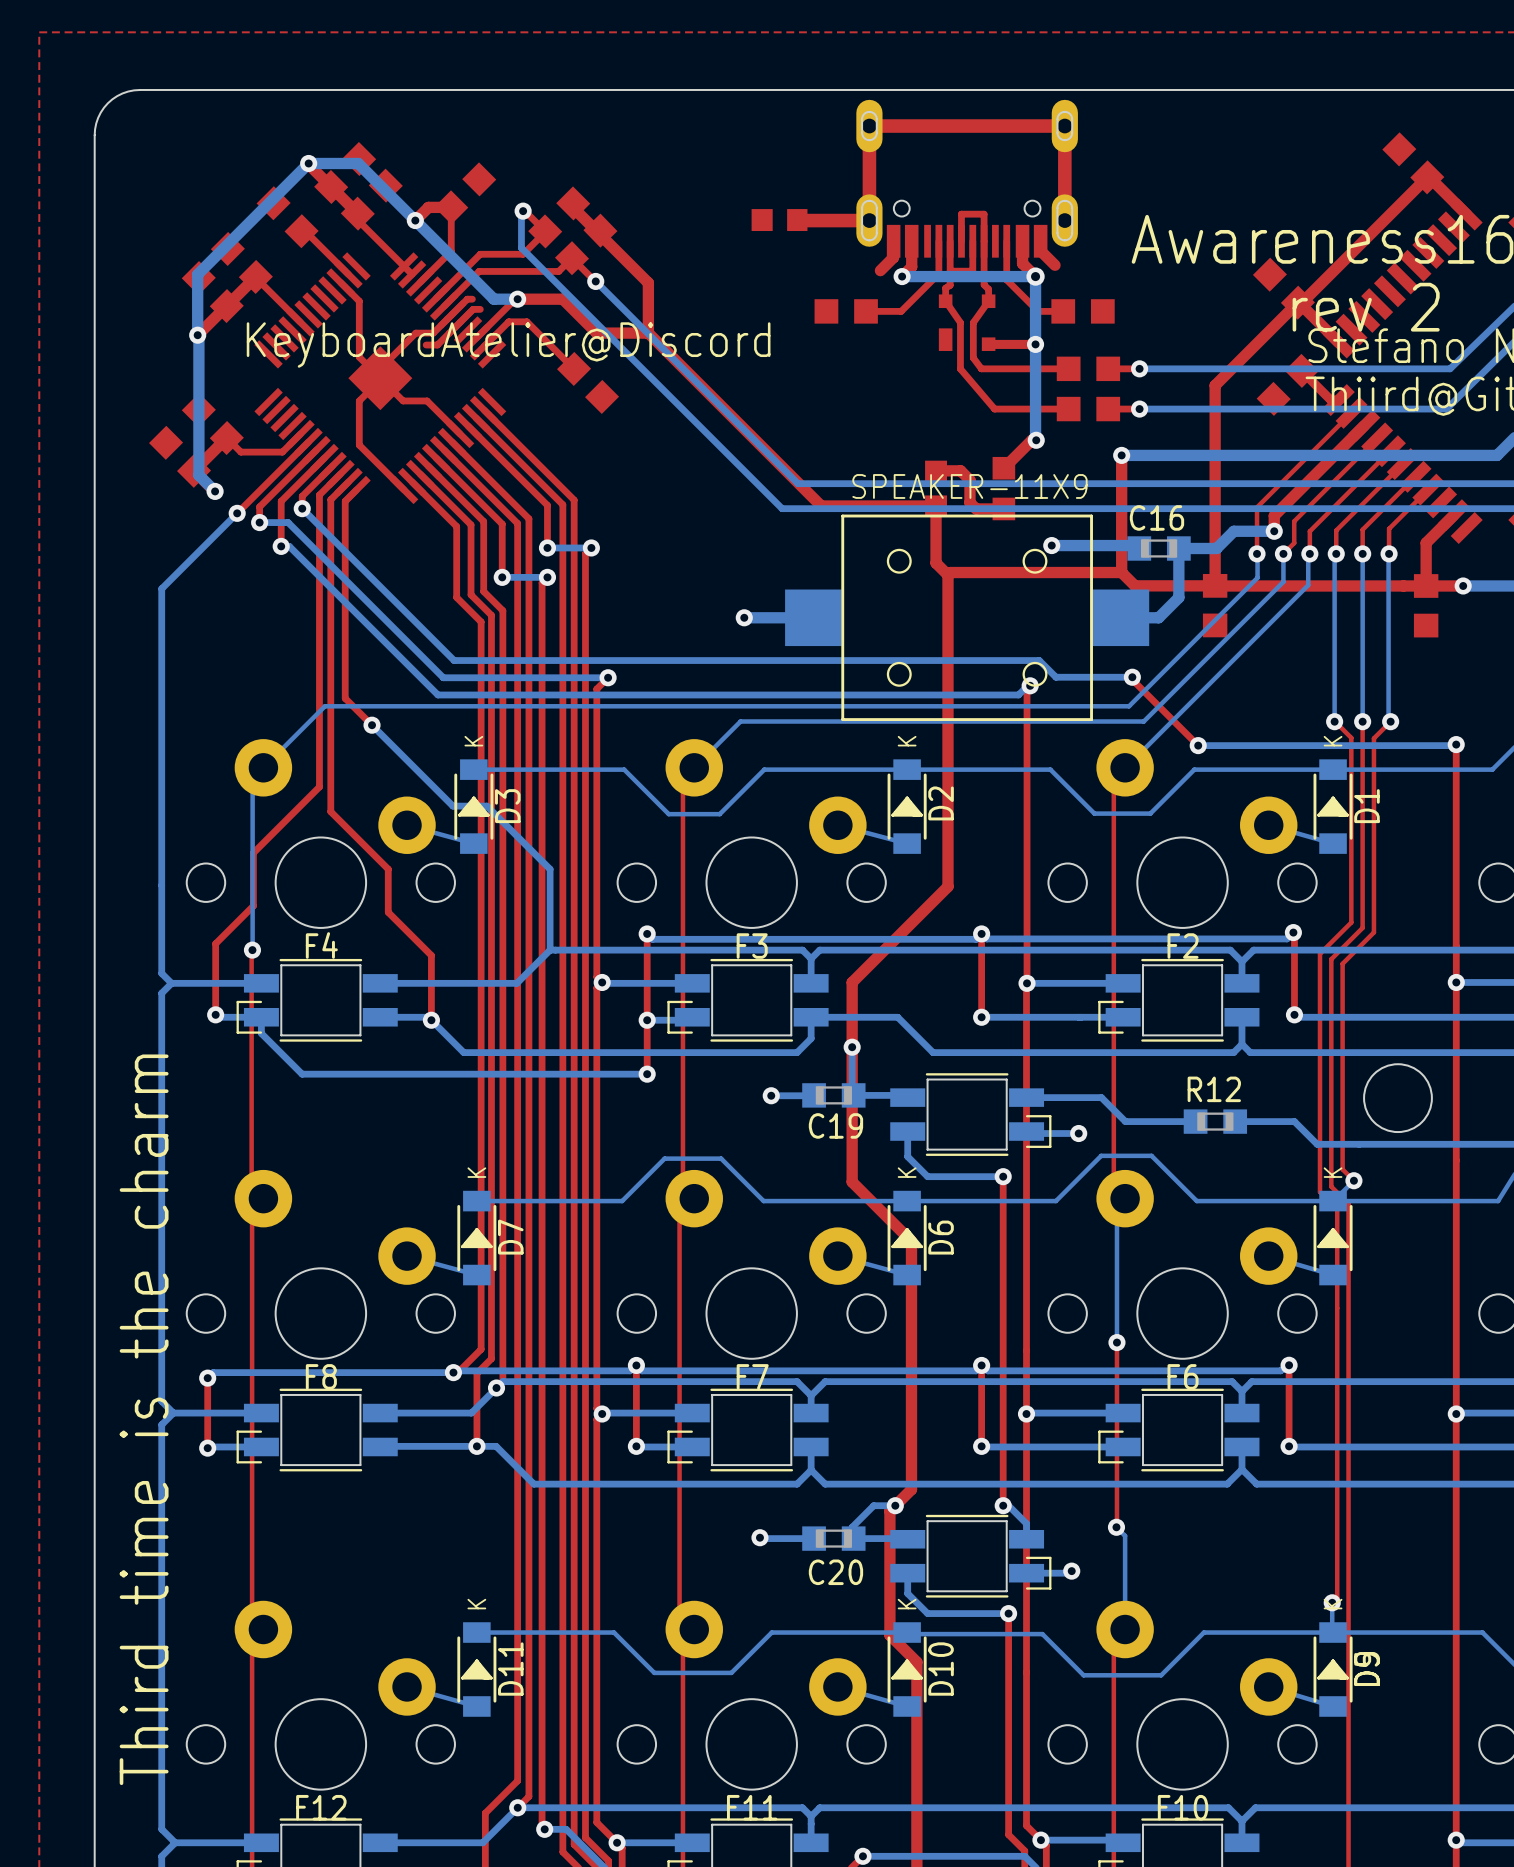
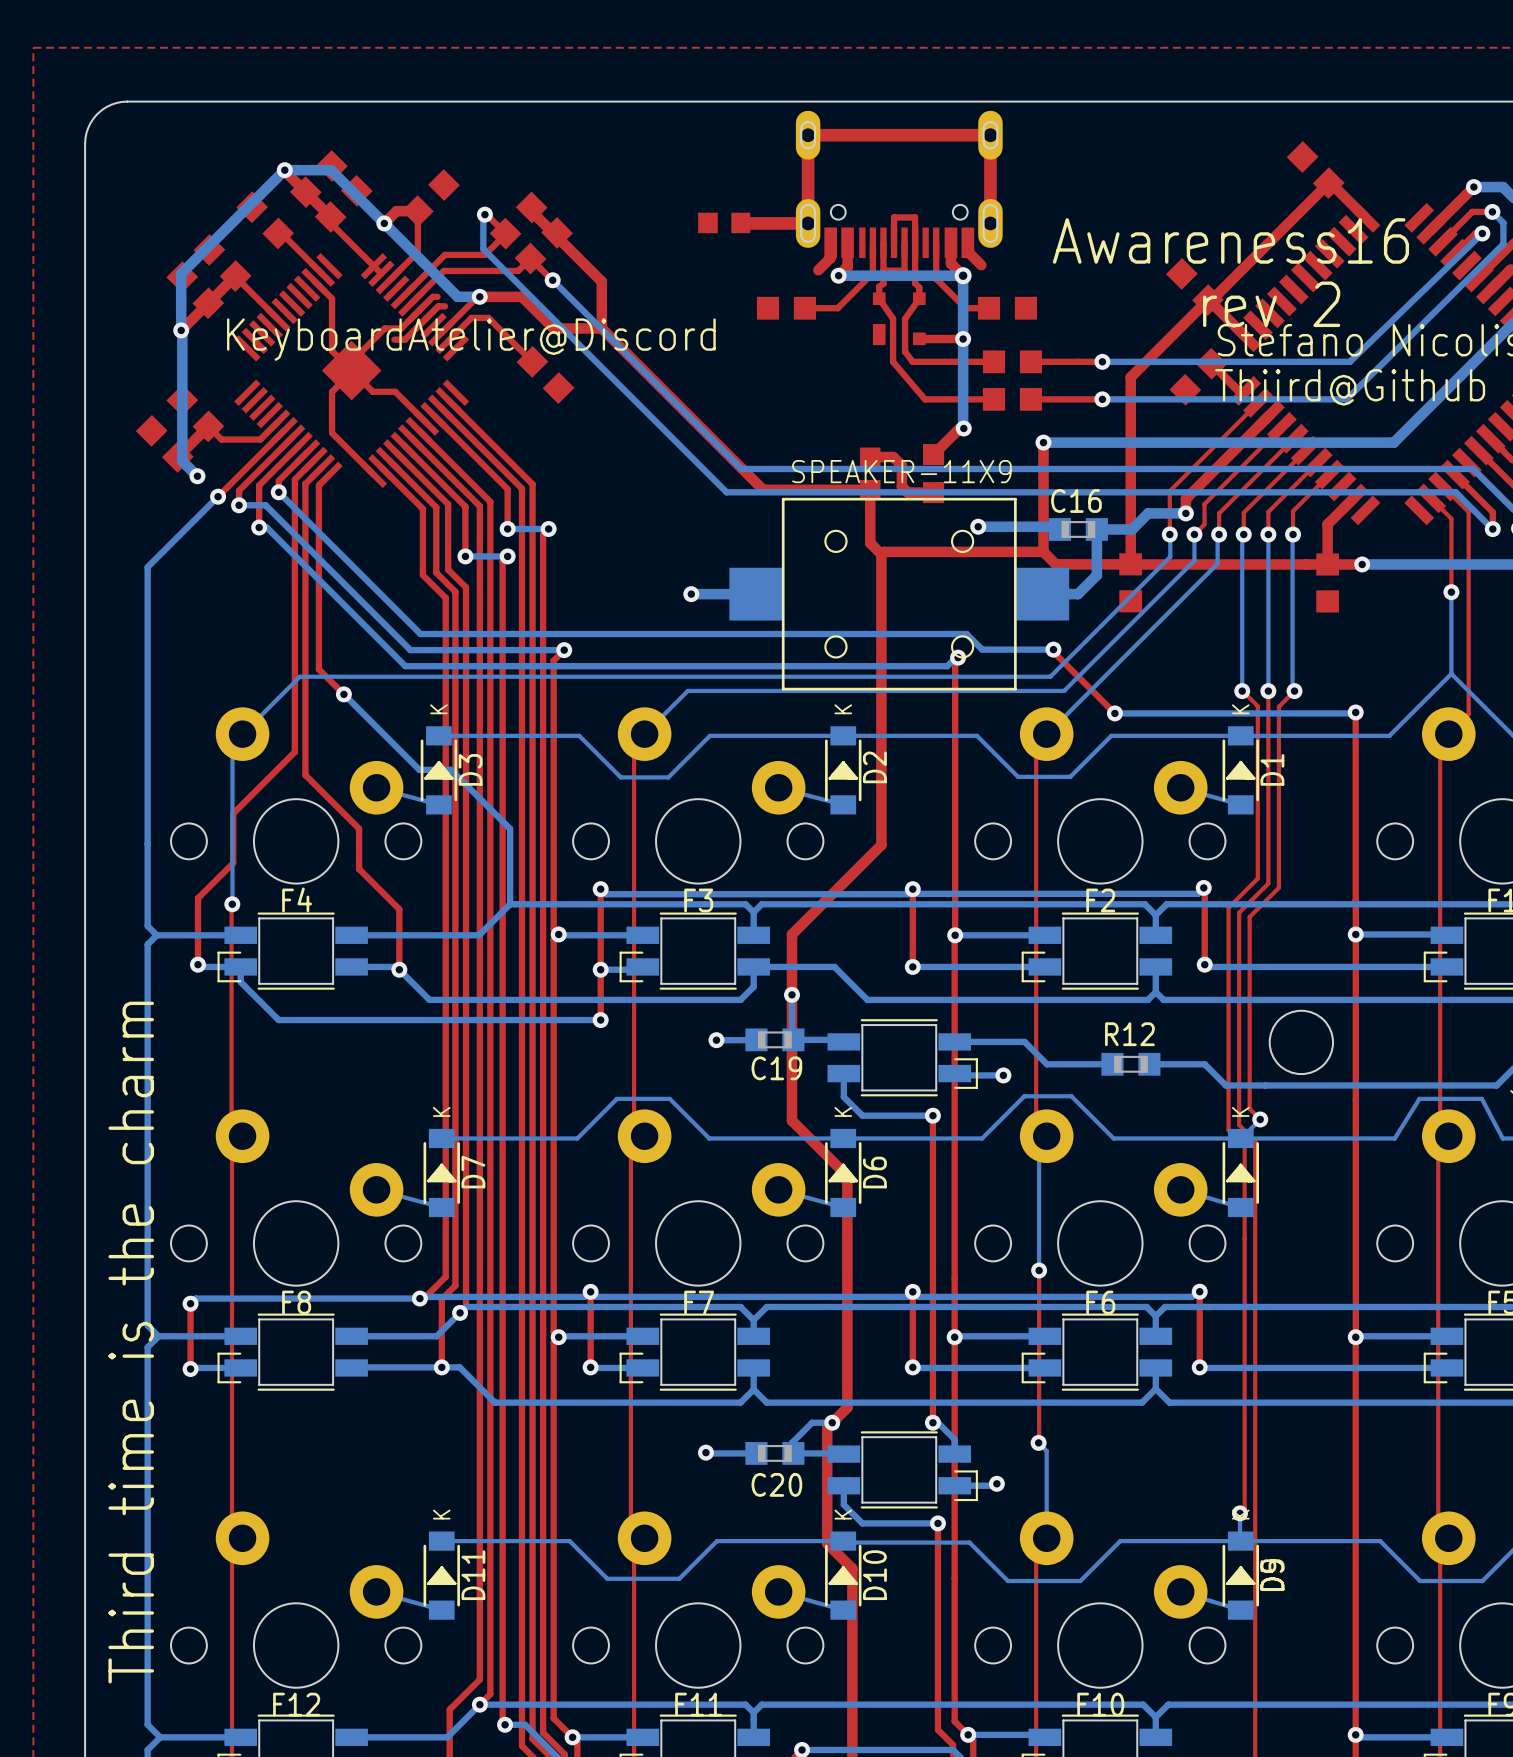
via: (1139, 368) -> none
top track: none -> (1102, 361) (1060, 361)
bottom track: (1184, 368) (1139, 368) -> none
via: none -> (1102, 361)
via: (1139, 409) -> none
top track: none -> (1102, 399) (1060, 399)
bottom track: (1184, 409) (1139, 409) -> none
via: none -> (1102, 399)

